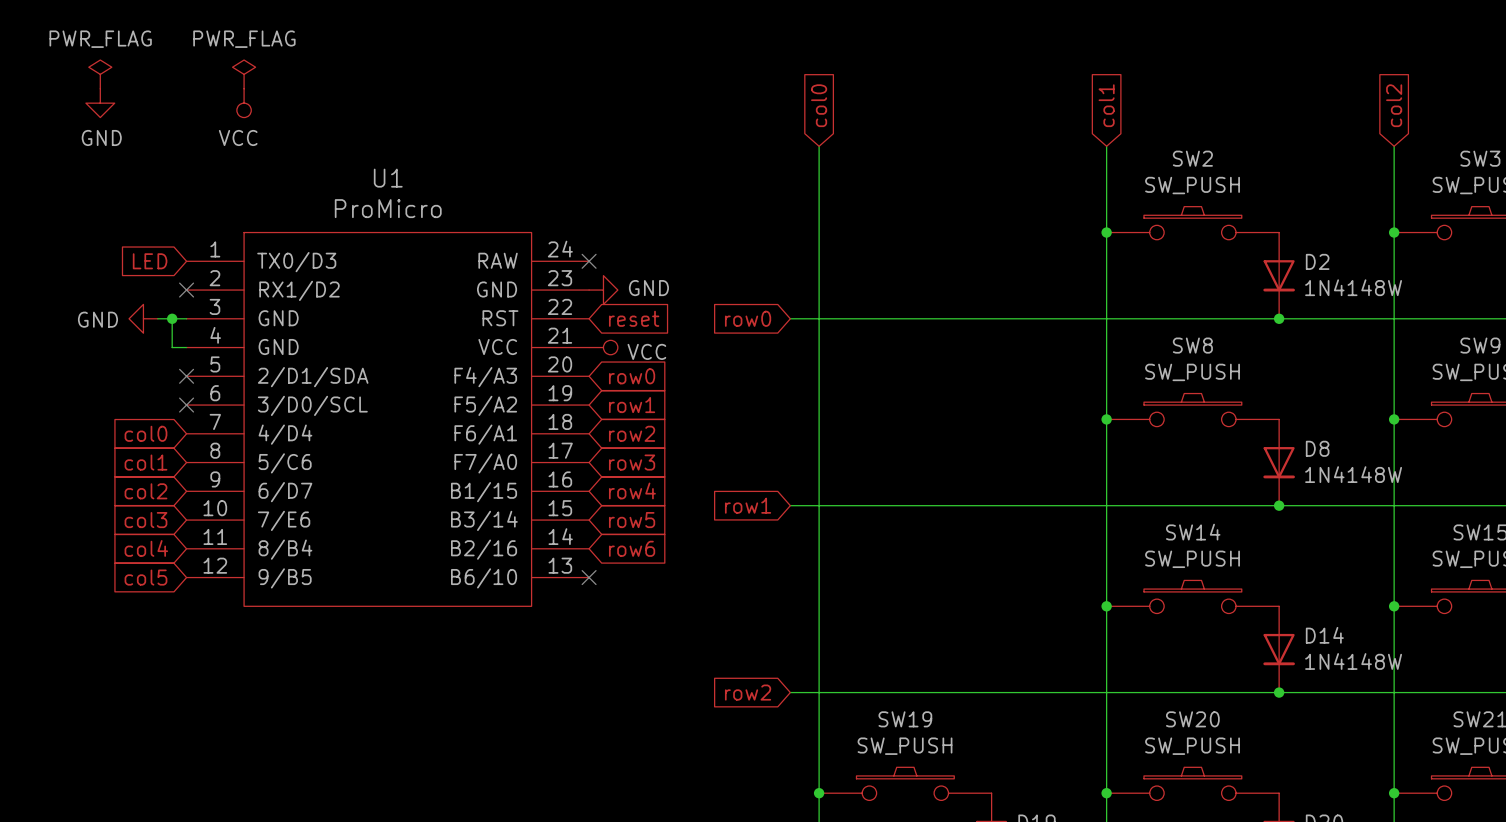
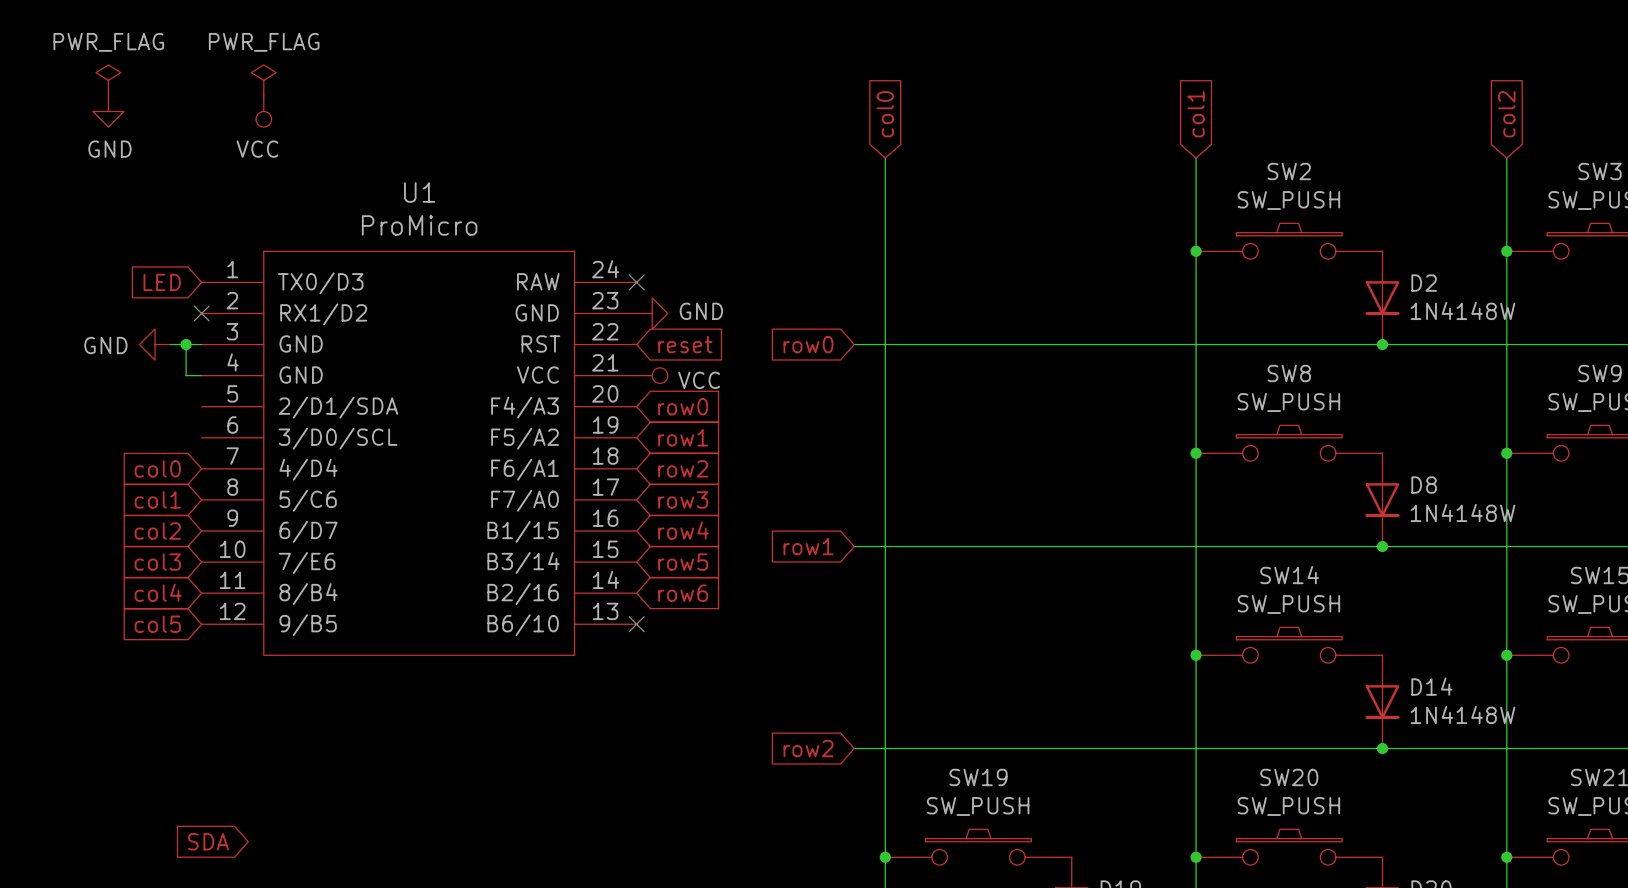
no-connect mark: (186, 376) -> none
no-connect mark: (186, 405) -> none
global label: none -> SDA (208, 841)

